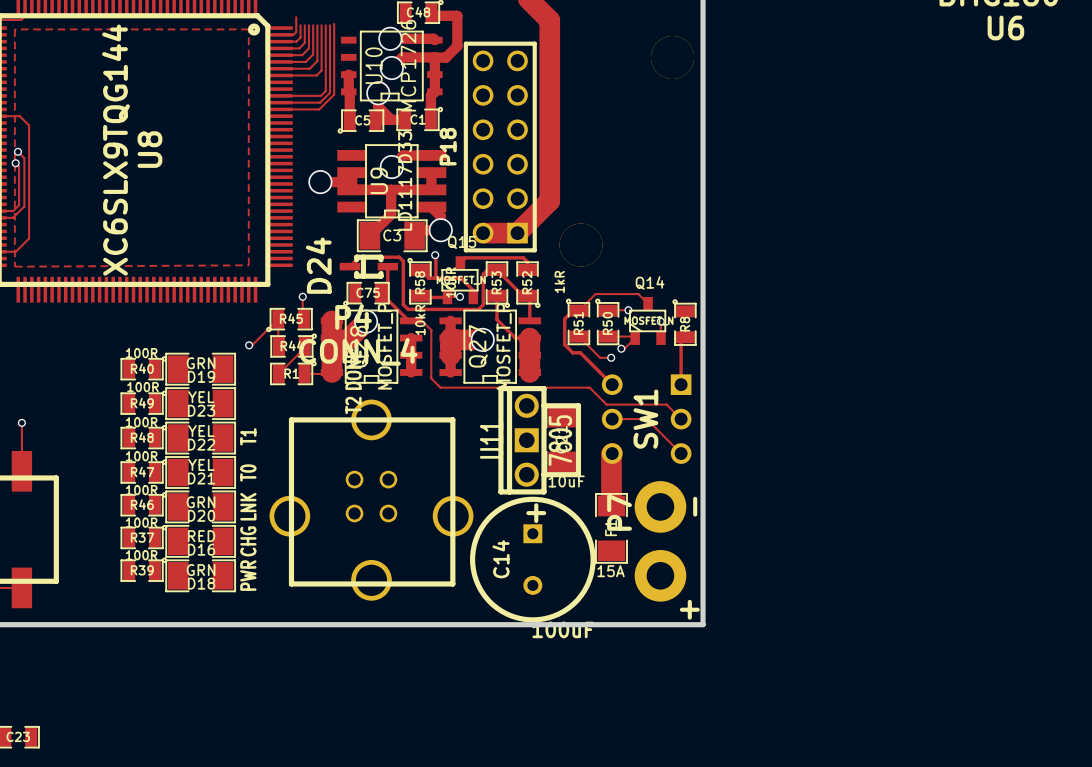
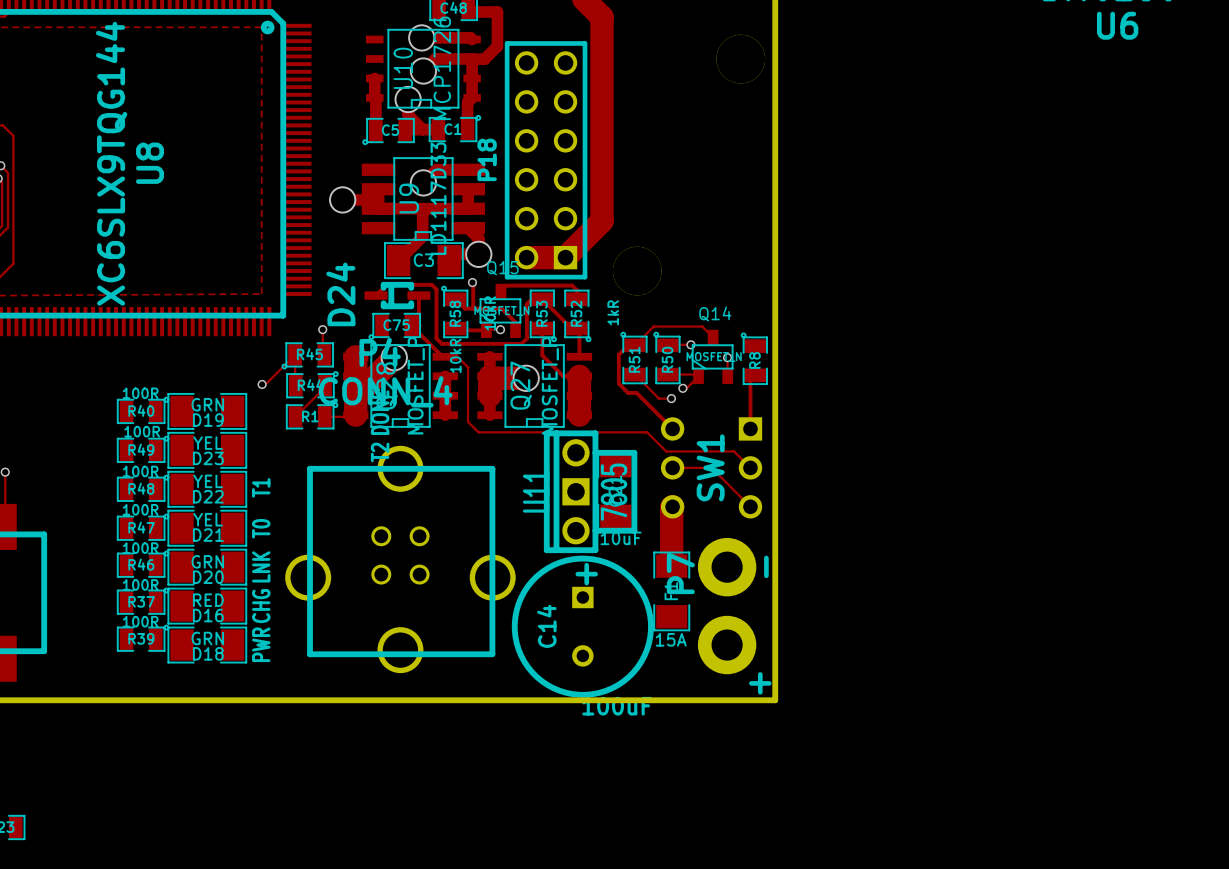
track: (296, 17) (296, 32) (293, 34) (279, 34) -> none
track: (334, 23) (334, 94) (319, 109) (279, 109) -> none
track: (300, 25) (300, 37) (296, 41) (279, 41) -> none
track: (304, 25) (304, 42) (299, 48) (279, 48) -> none
track: (308, 25) (308, 48) (302, 55) (279, 55) -> none
track: (313, 25) (313, 54) (305, 61) (279, 61) -> none
track: (317, 25) (317, 61) (309, 68) (279, 68) -> none
track: (321, 25) (321, 70) (316, 75) (279, 75) -> none
track: (325, 25) (325, 91) (321, 95) (279, 95) -> none
track: (329, 25) (329, 92) (320, 102) (279, 102) -> none

